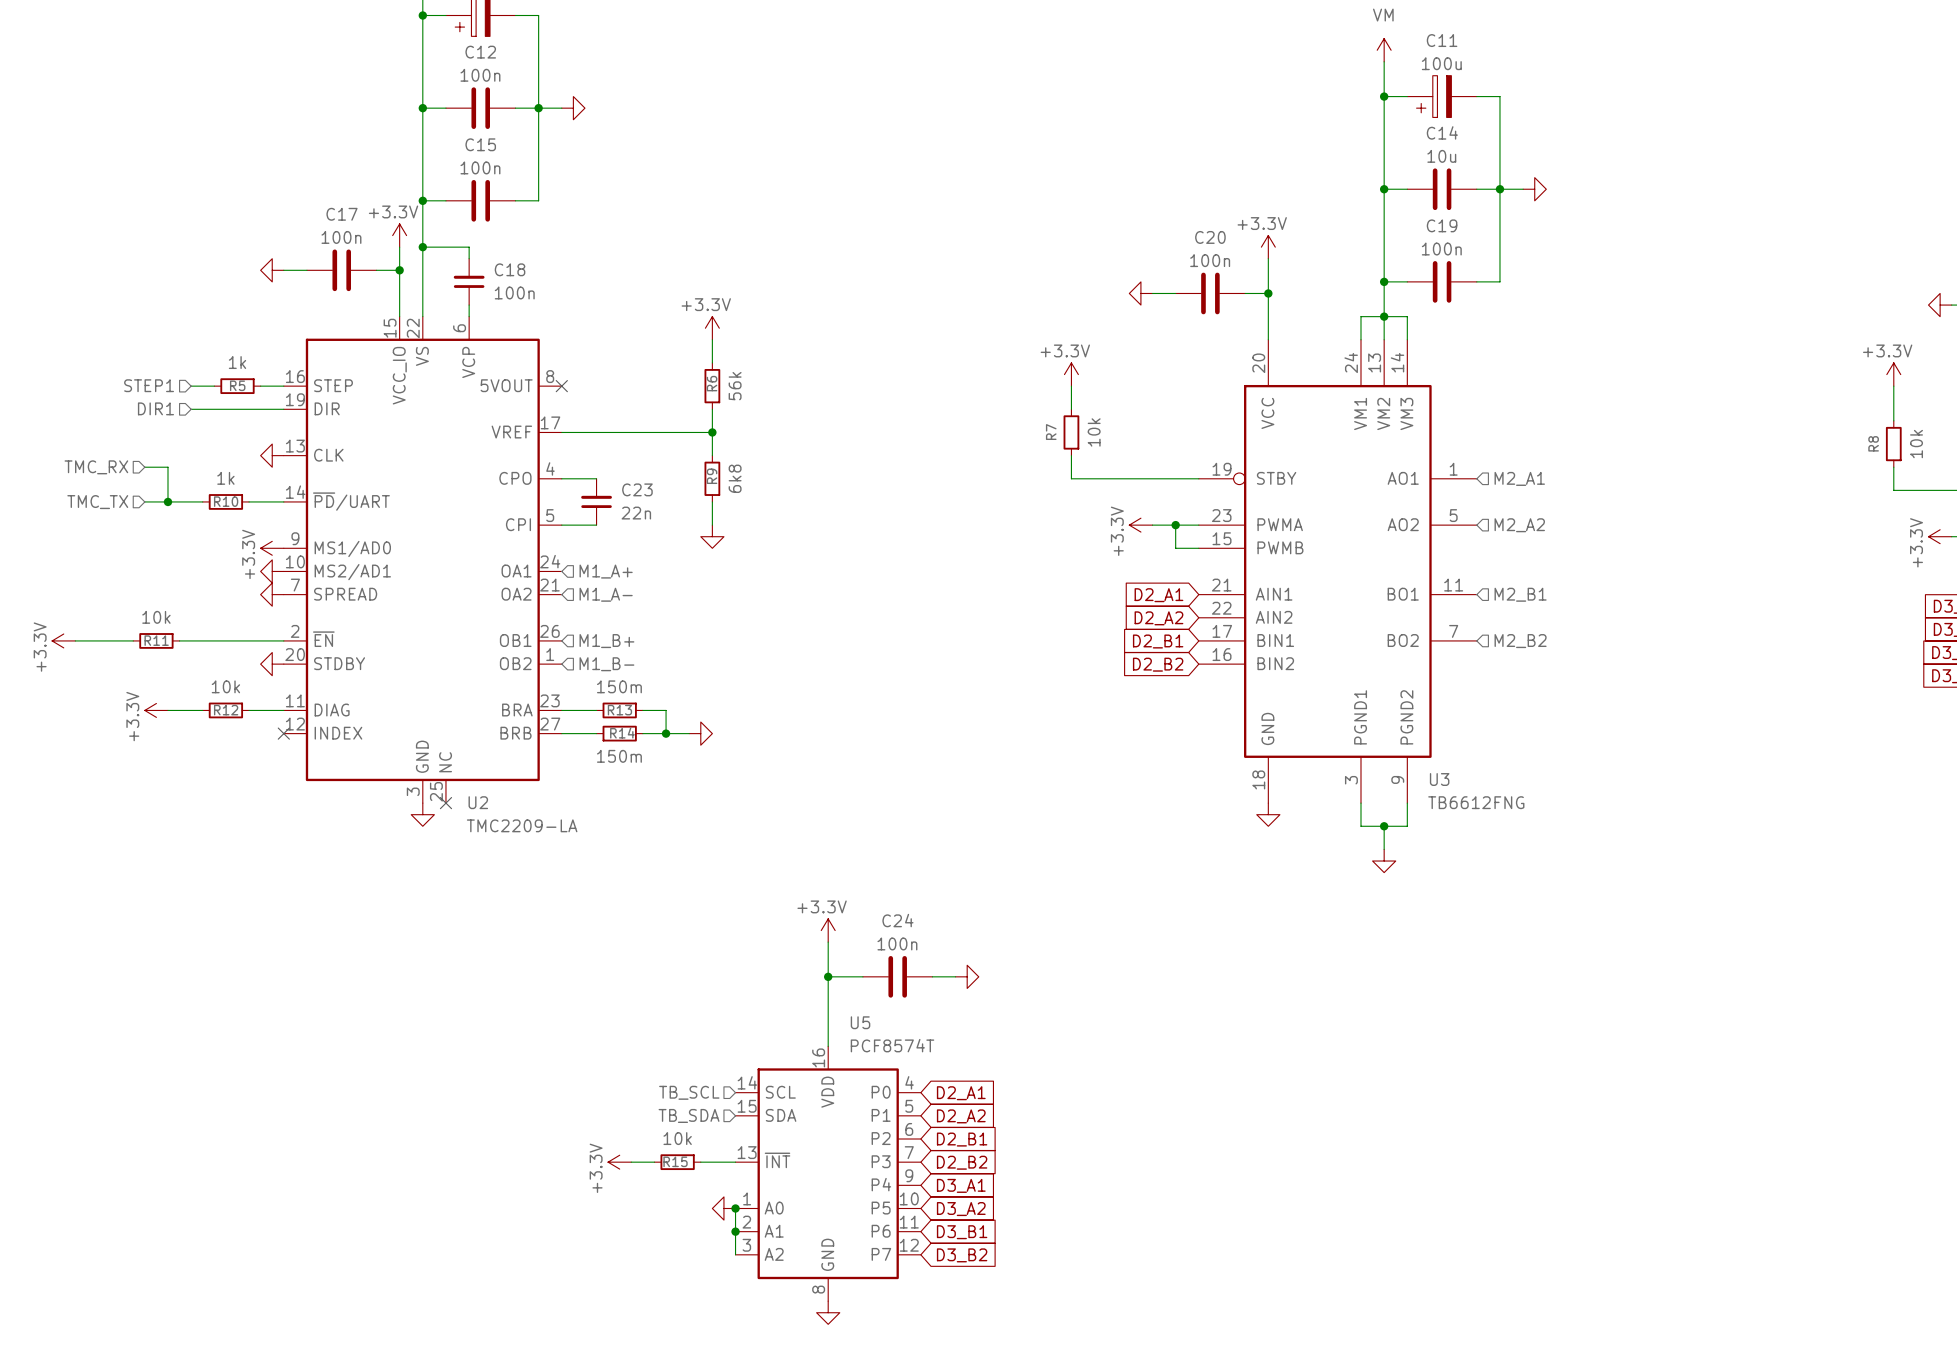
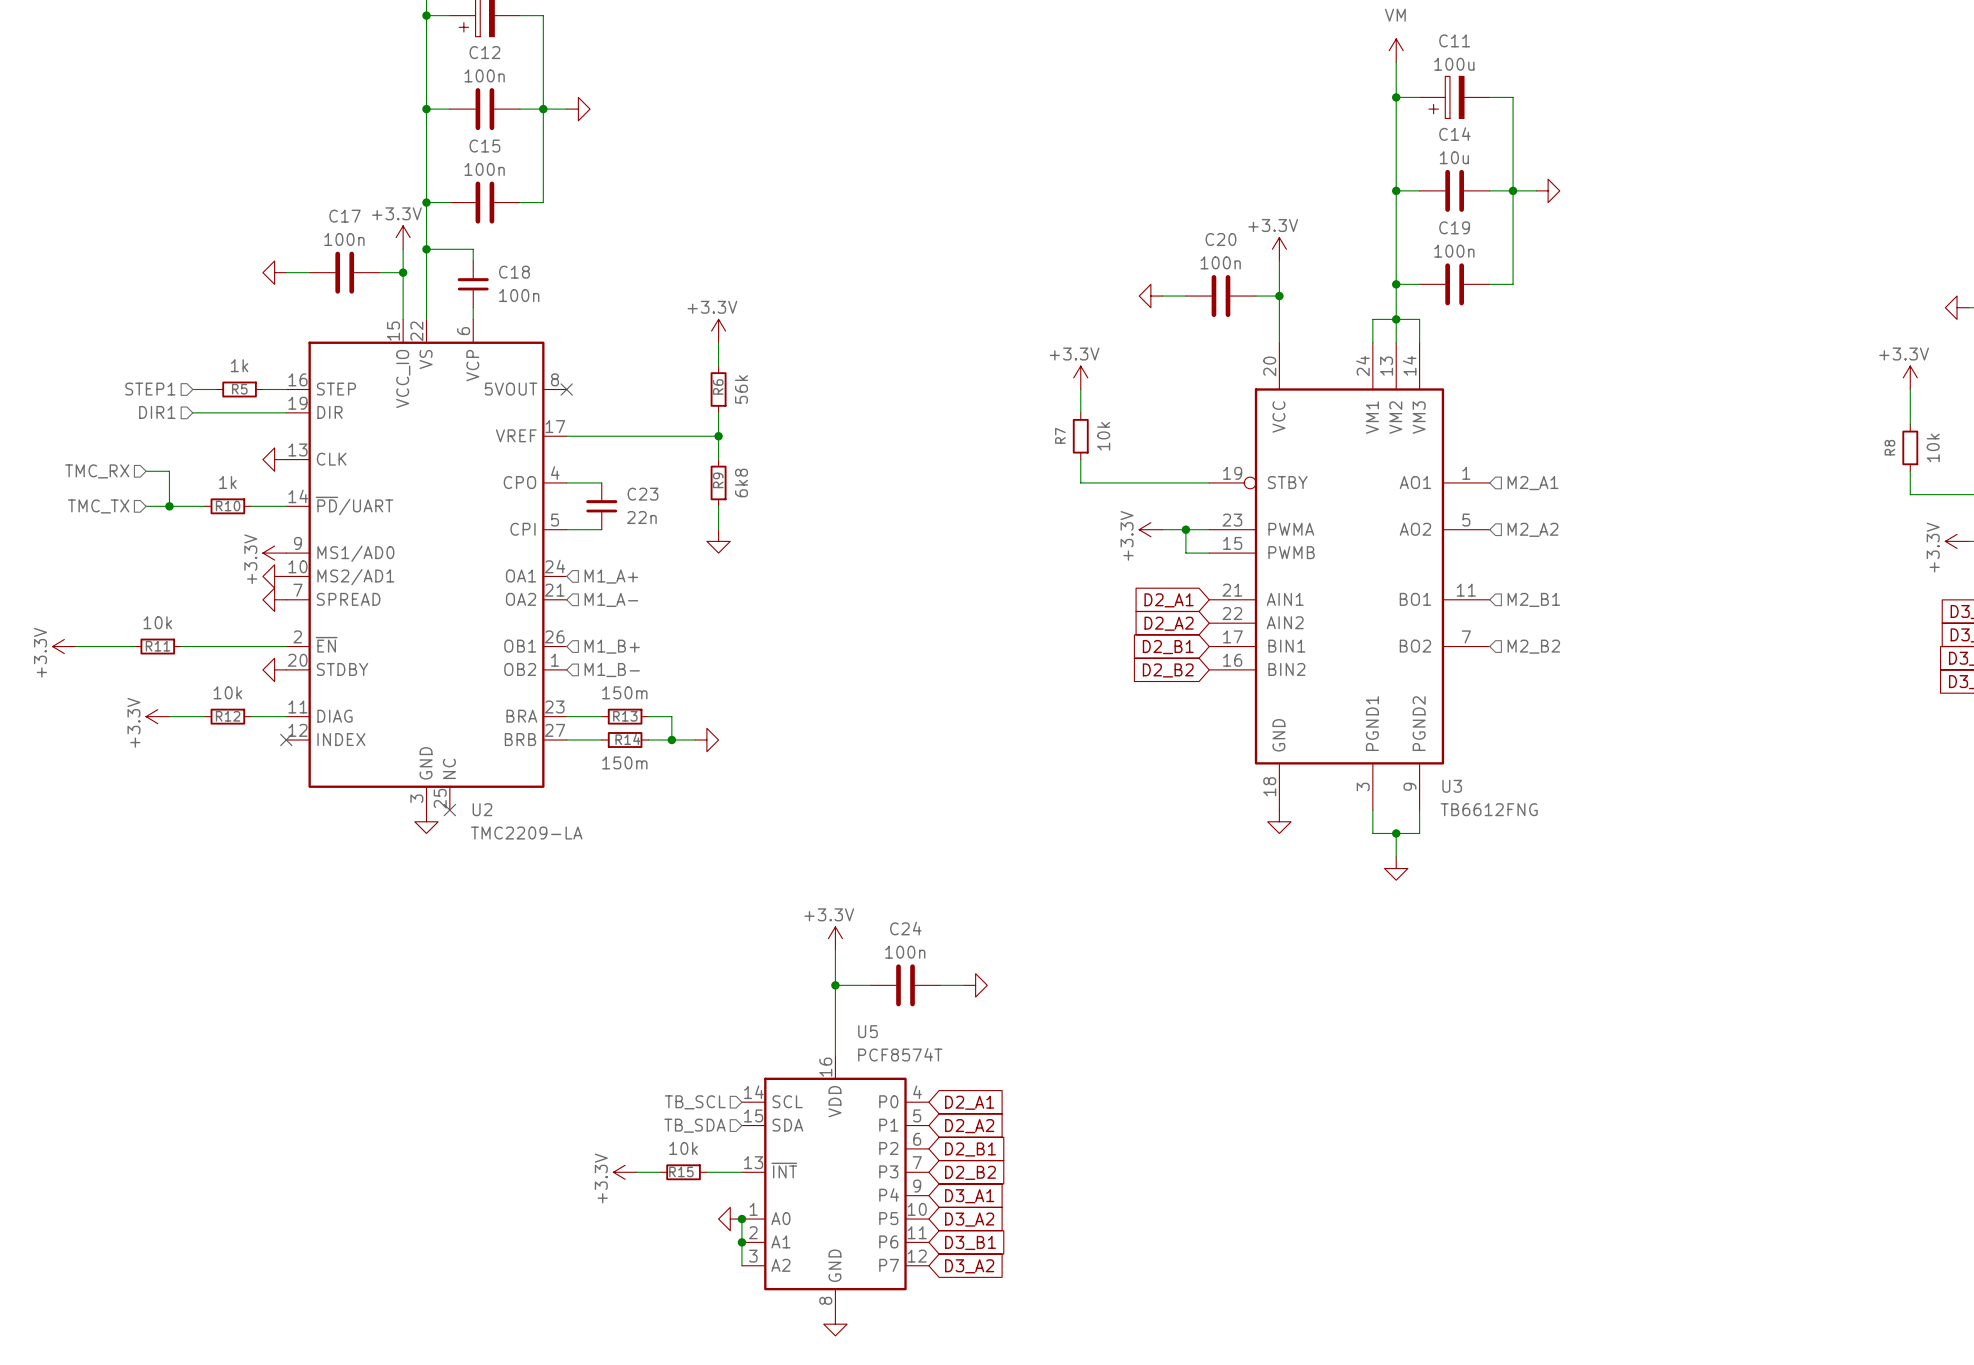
global label: D3_B2 (962, 1255) -> D3_A2 (969, 1266)

